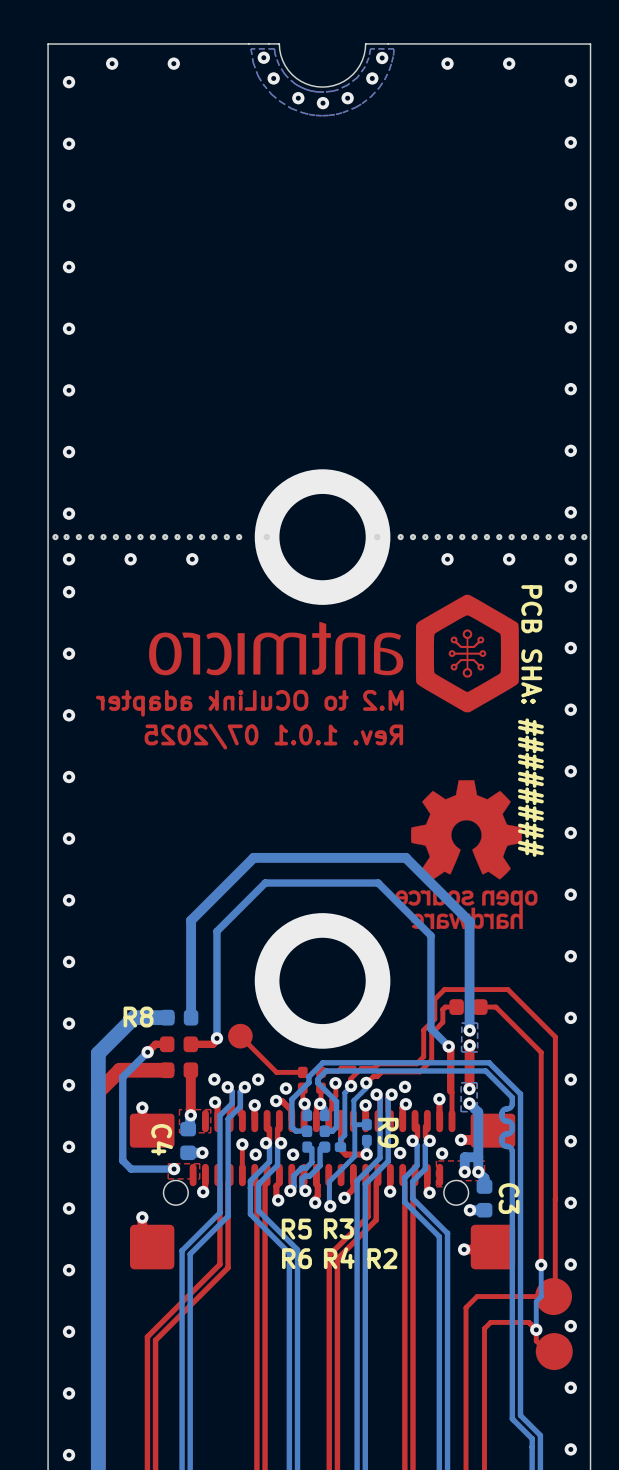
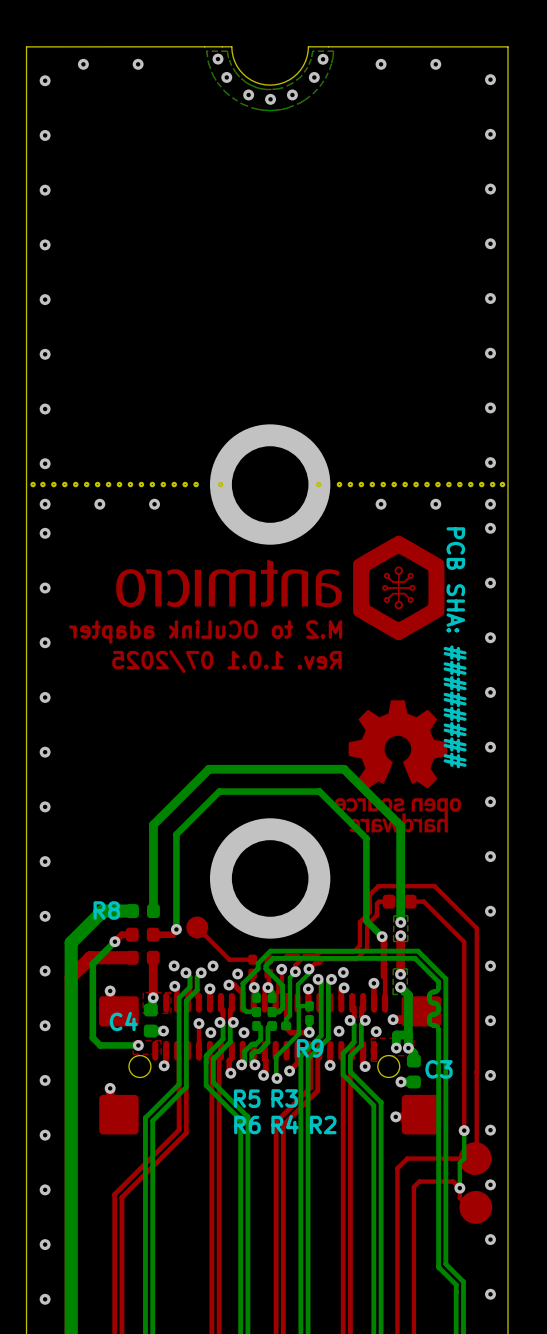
R9 name rotation: 0° (388, 1132) -> 90° counterclockwise (310, 1048)
C4 name rotation: 0° (162, 1139) -> 90° counterclockwise (123, 1021)
C3 name rotation: 0° (509, 1198) -> 90° counterclockwise (439, 1069)

